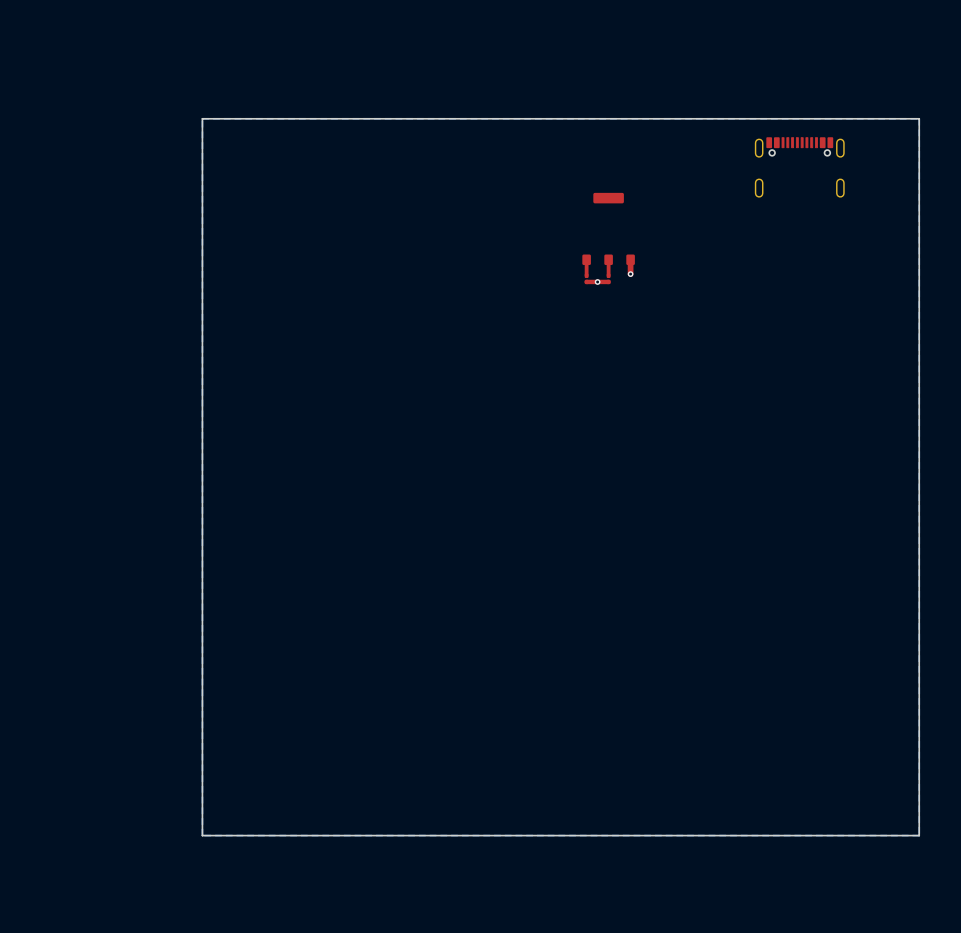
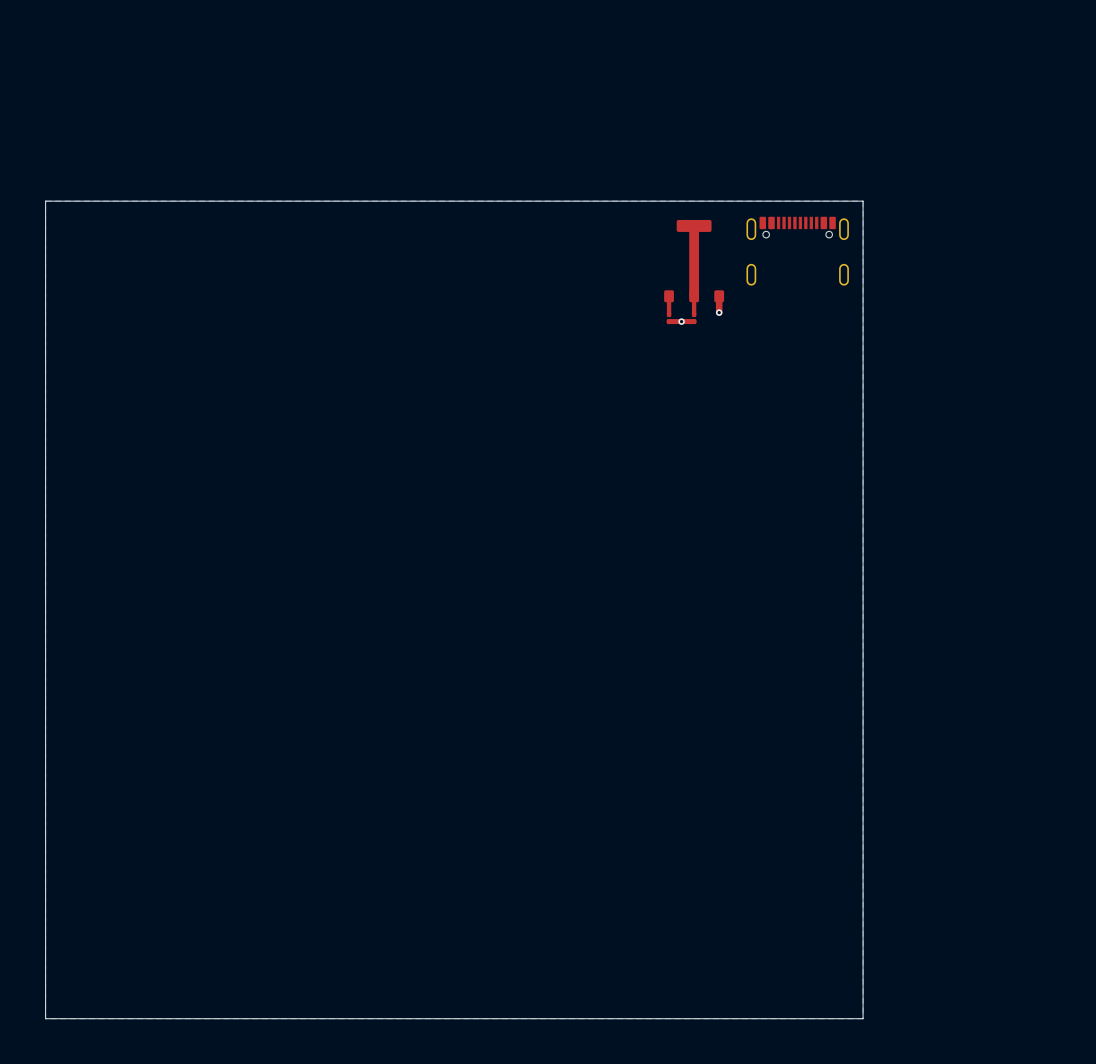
board edge: (919, 118) (202, 118) (202, 835) (919, 835) (919, 118) -> (863, 201) (45, 201) (45, 1018) (863, 1018) (863, 201)
part position: (799, 167) -> (797, 251)
top track: none -> (694, 225) (694, 296)

